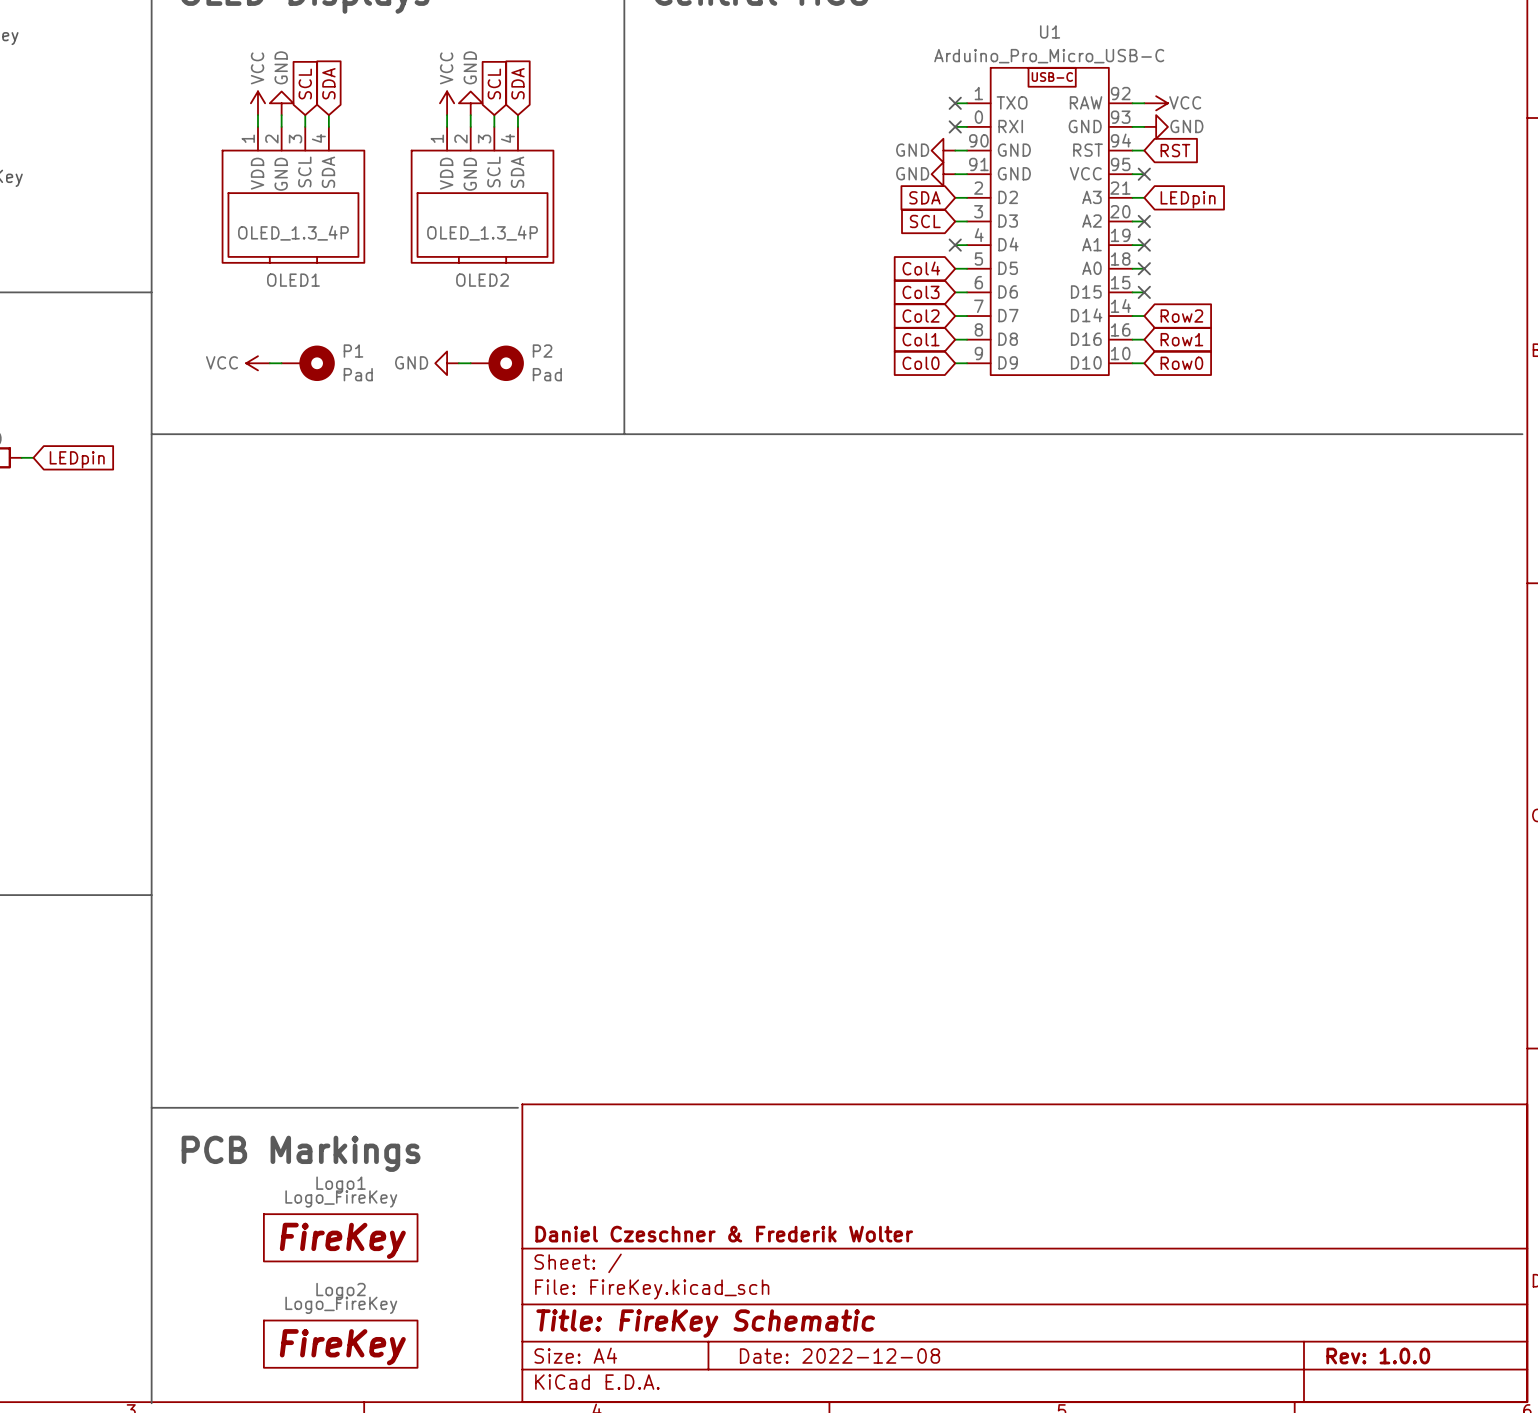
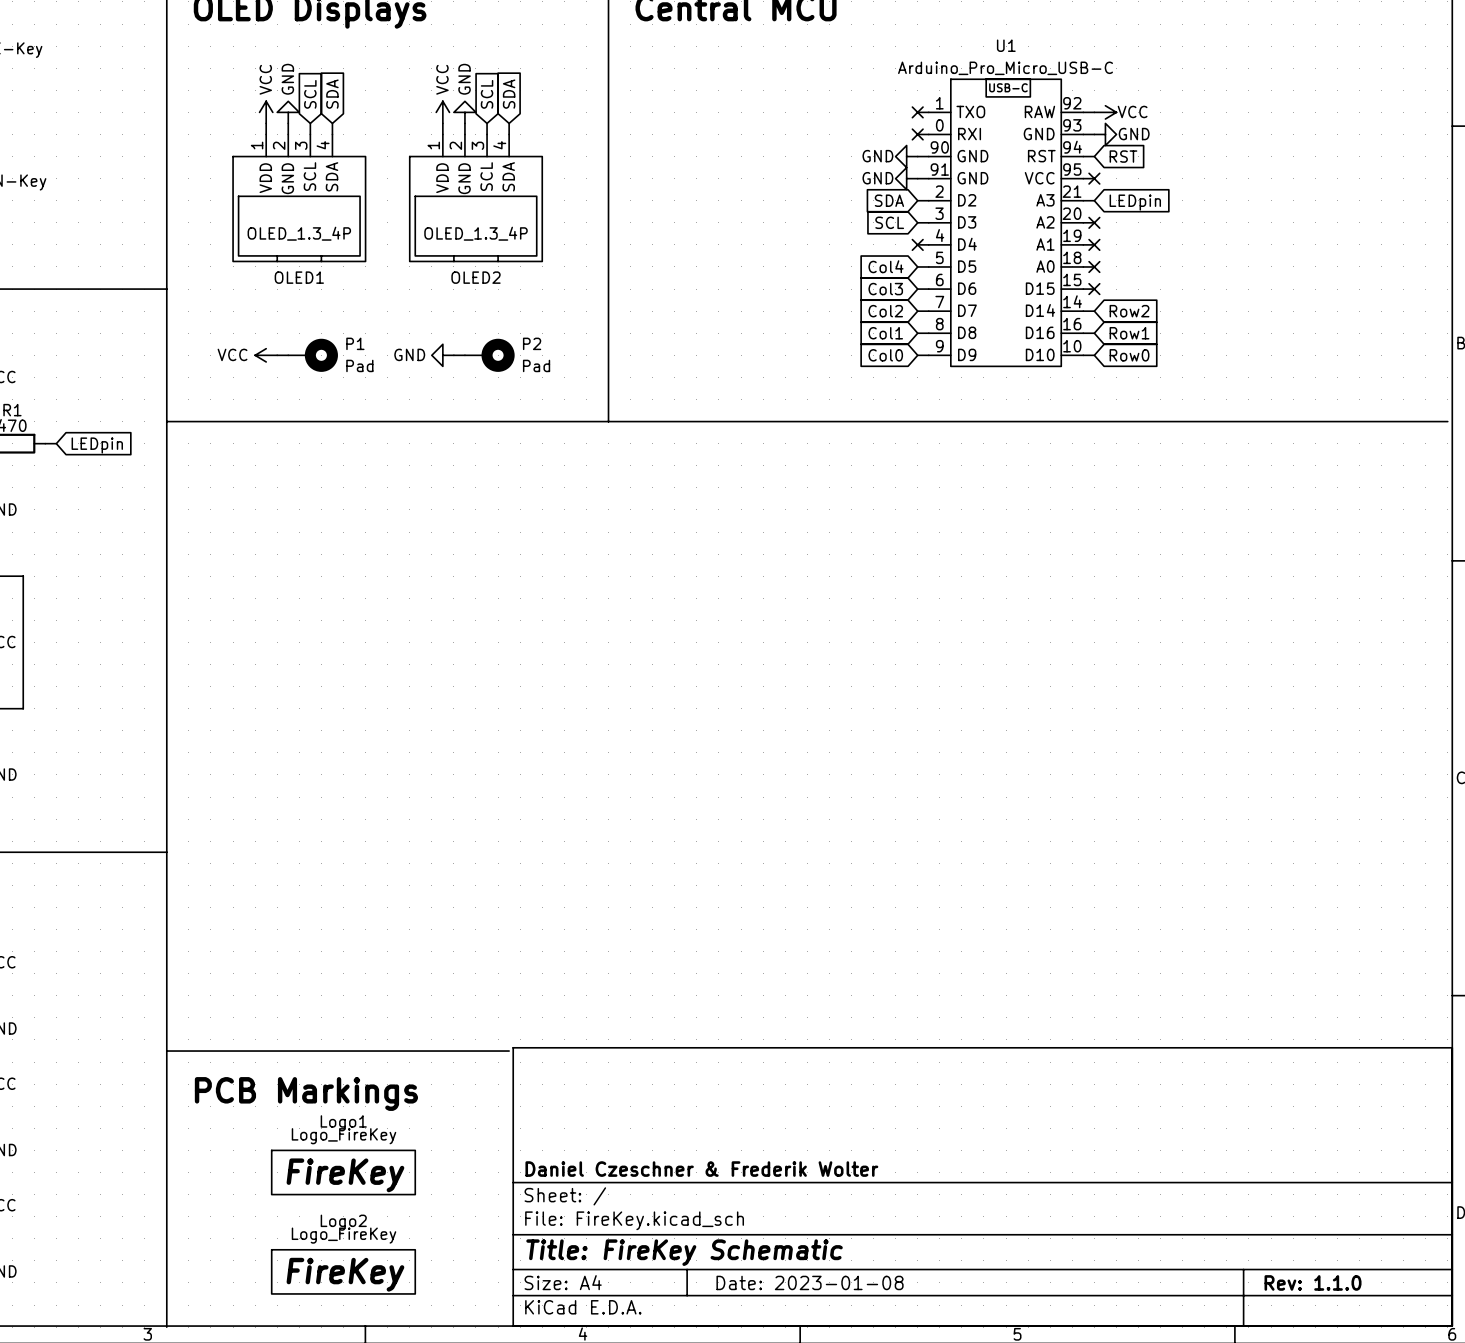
title block: Date: 2022-12-08 (840, 1356) -> Date: 2023-01-08 (810, 1282)
title block: Rev: 1.0.0 (1378, 1356) -> Rev: 1.1.0 (1313, 1282)

